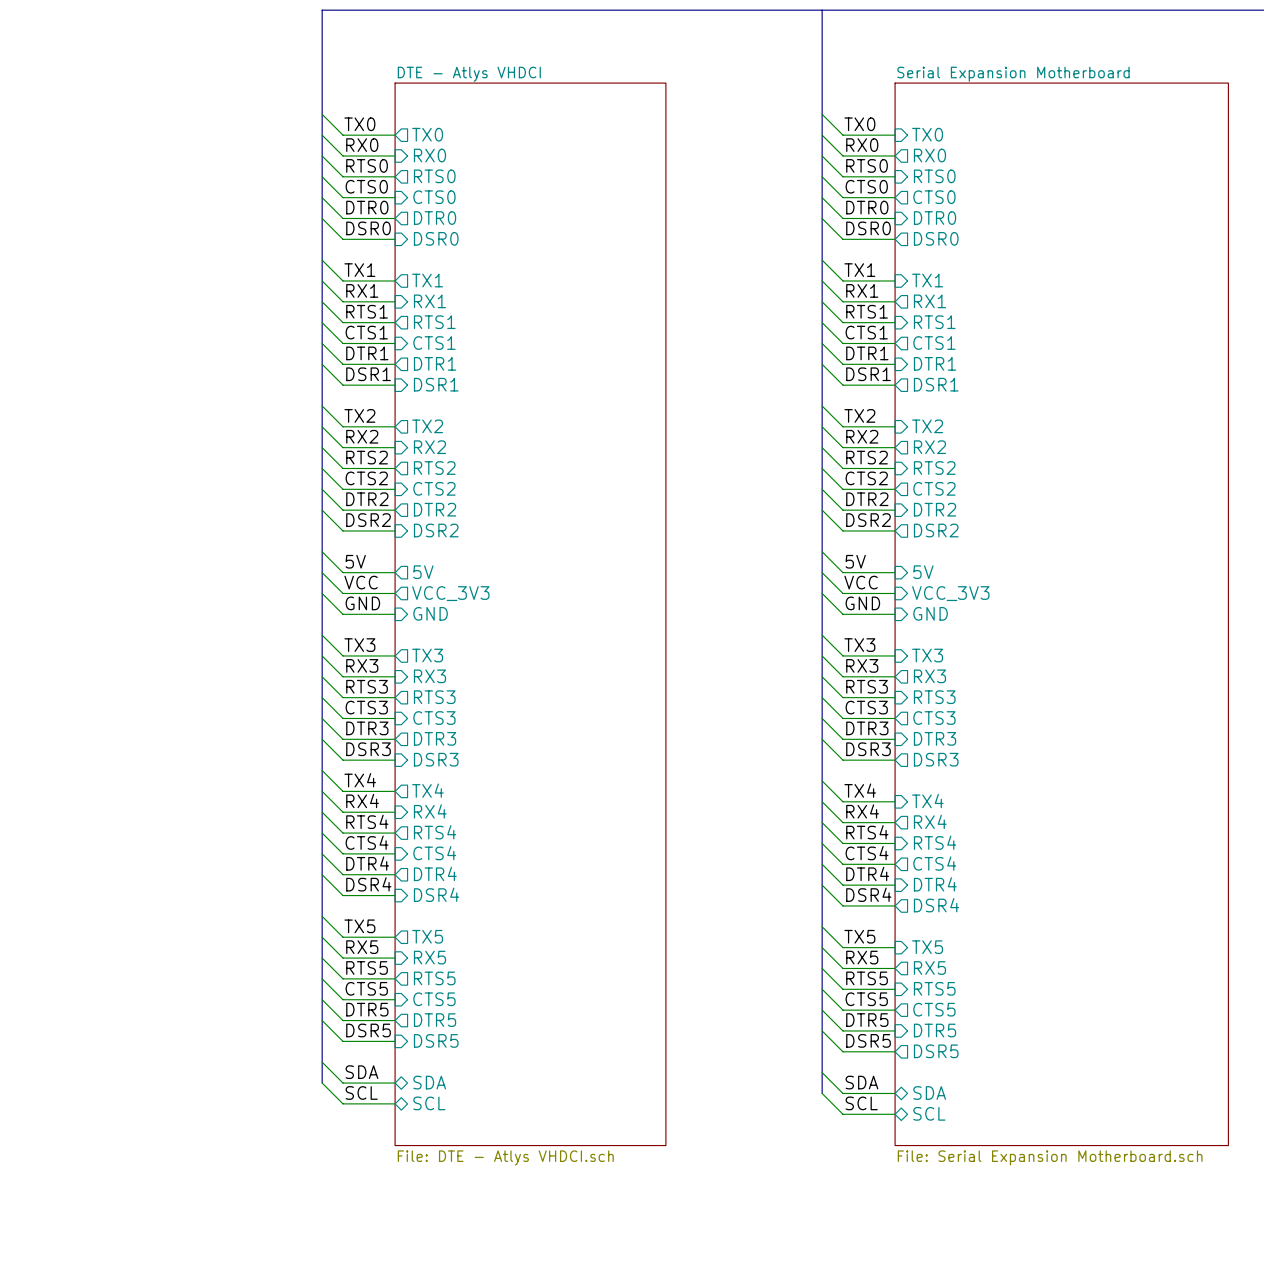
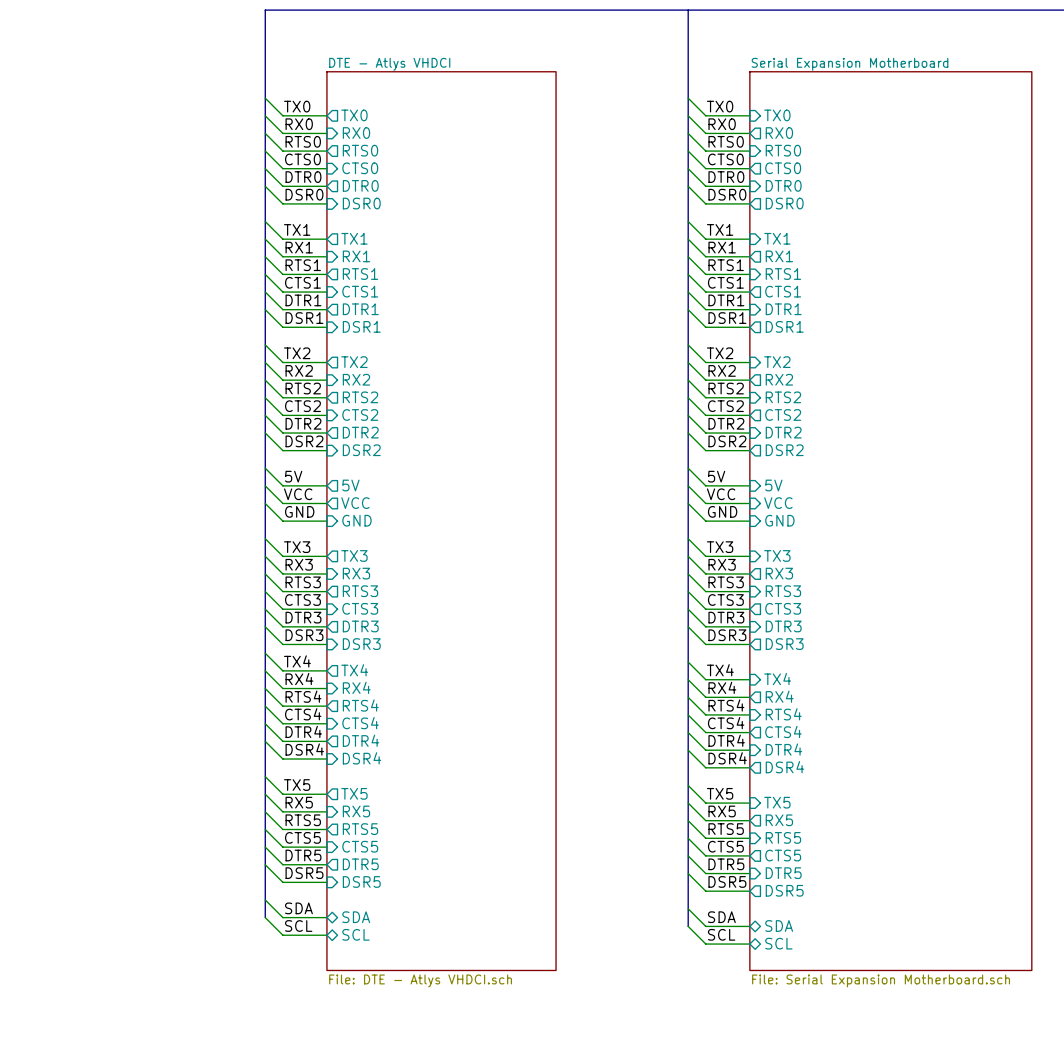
sheet pin: VCC_3V3 (450, 593) -> VCC (355, 503)
sheet pin: VCC_3V3 (950, 593) -> VCC (778, 503)

